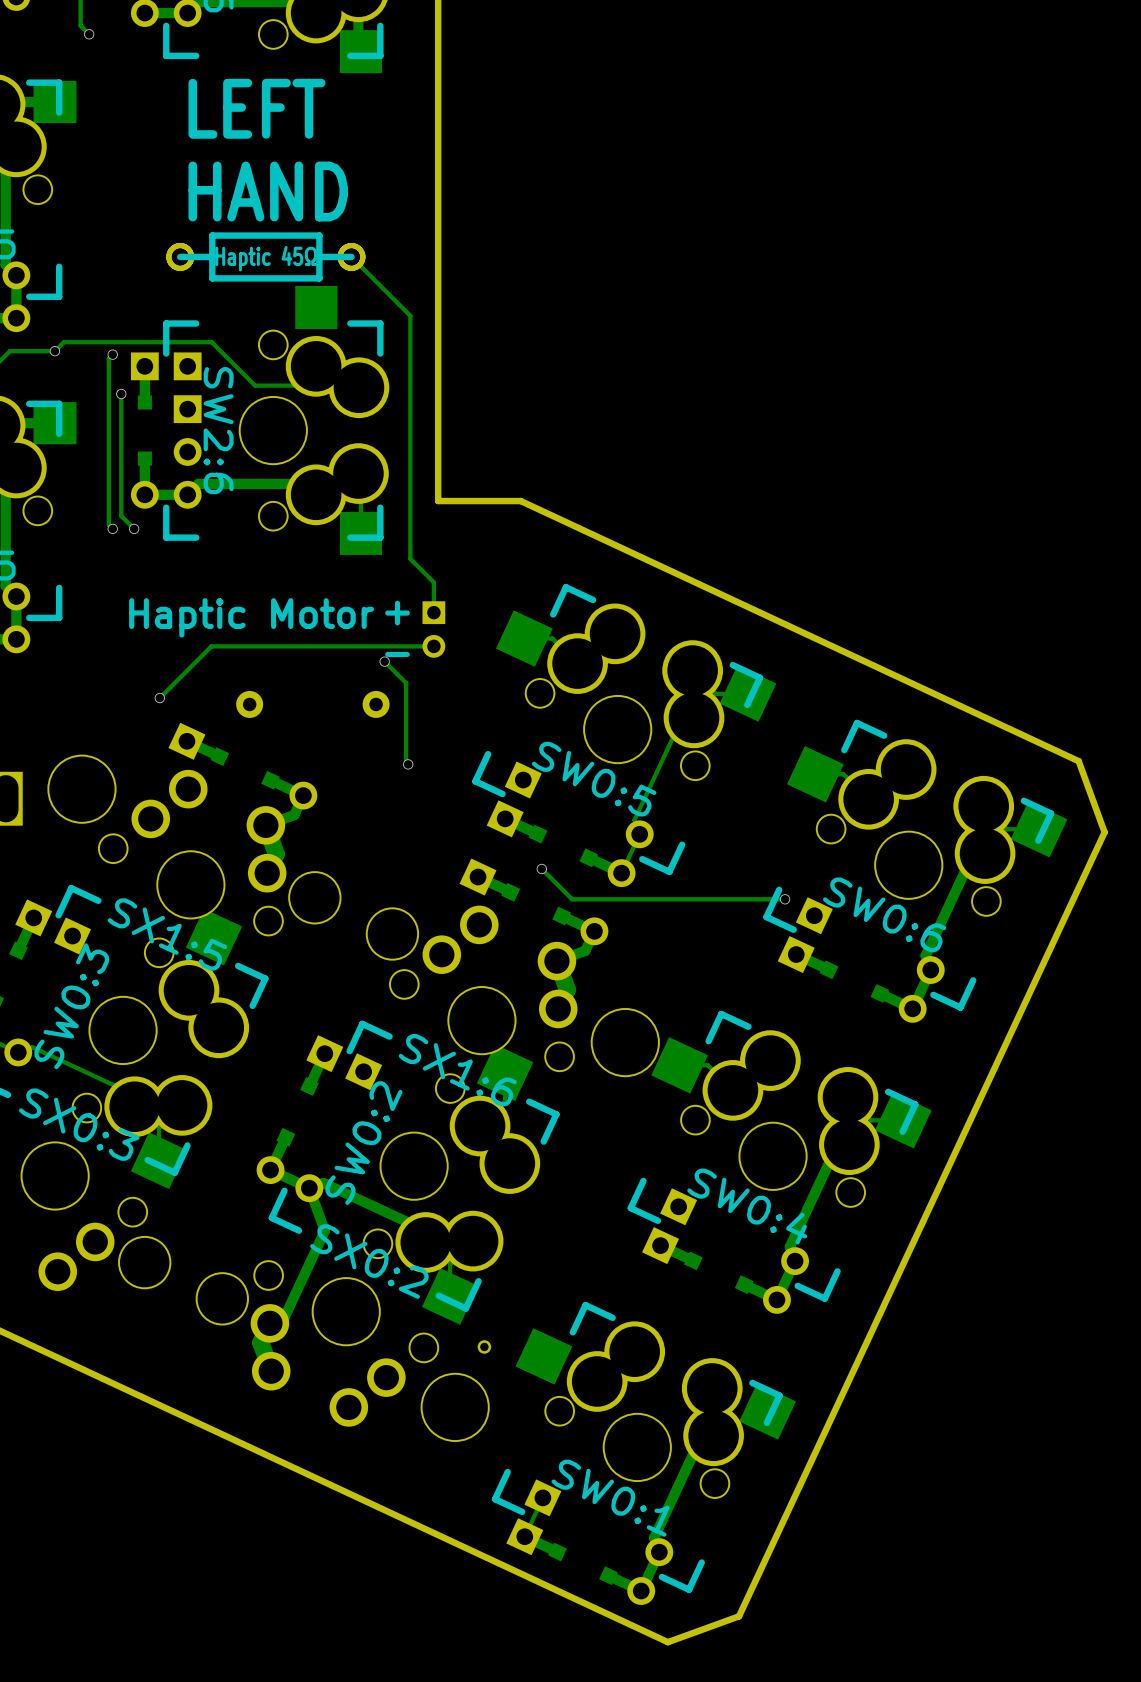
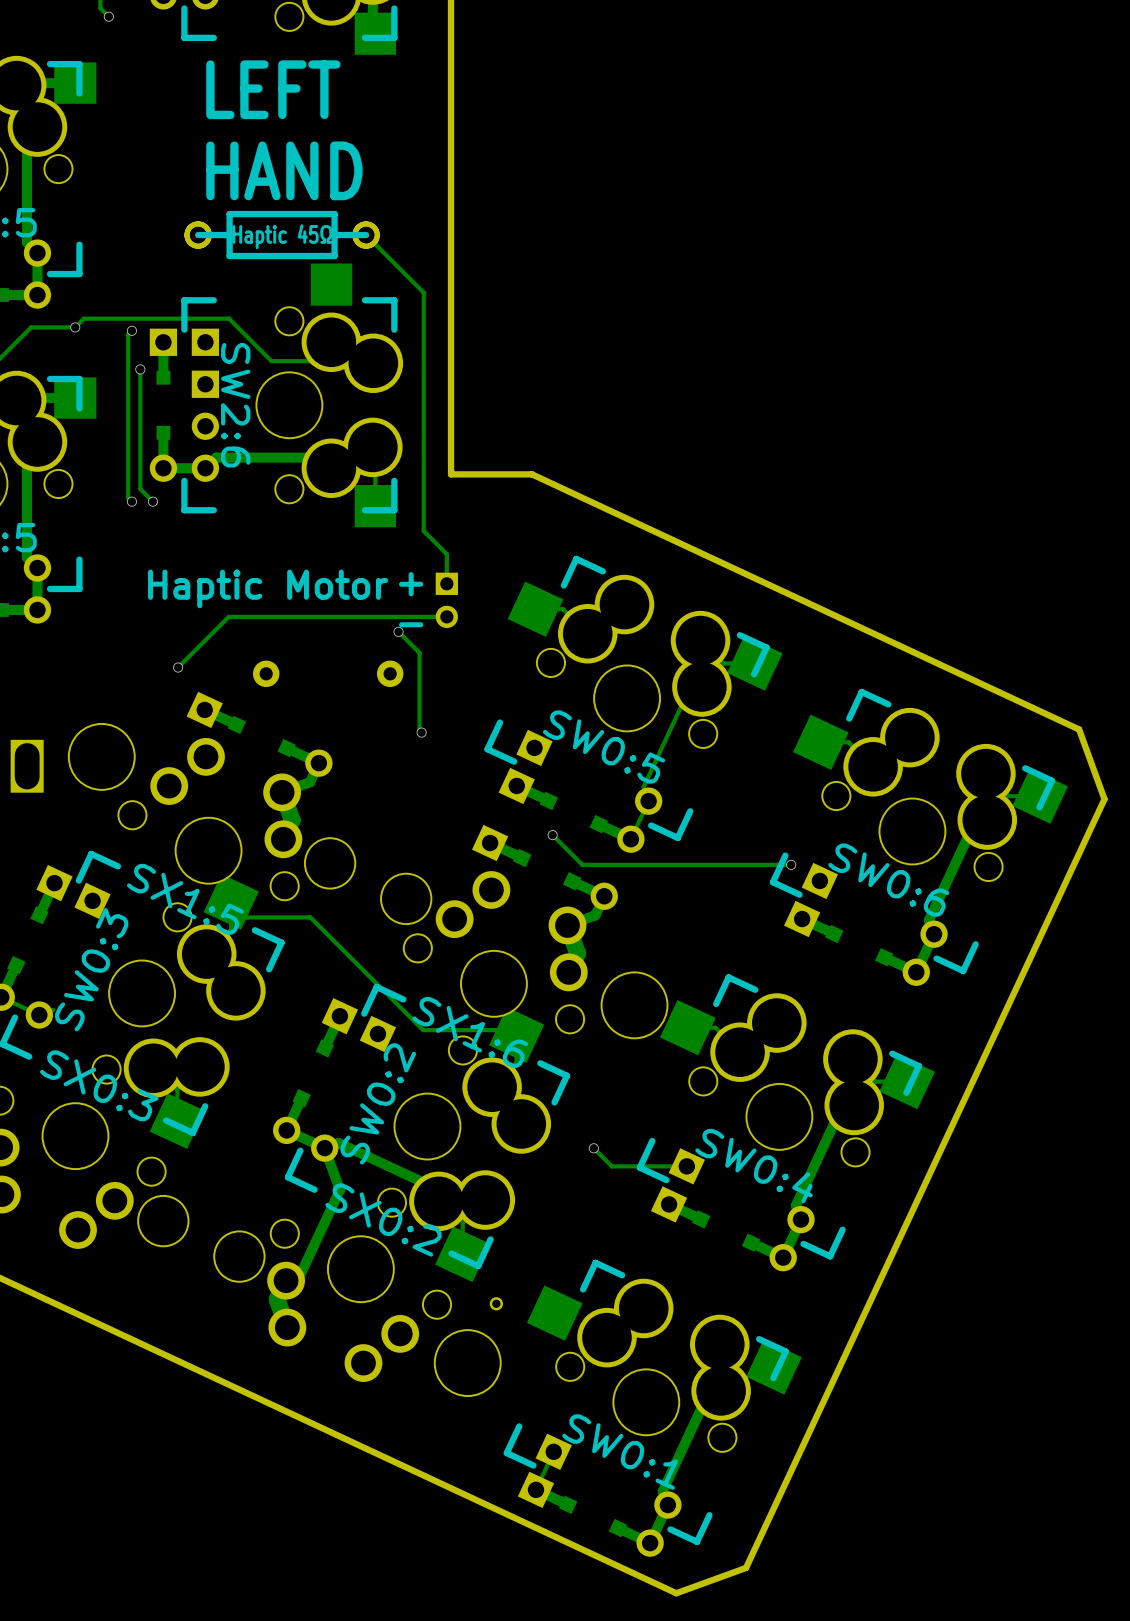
track: none -> (206, 954) (231, 929) (231, 901) (246, 917) (310, 917) (423, 1030) (511, 1030) (516, 1034)
track: (32, 1047) (129, 1092) -> none
track: none -> (593, 1148) (611, 1166) (686, 1166)
via: none -> (593, 1148)

